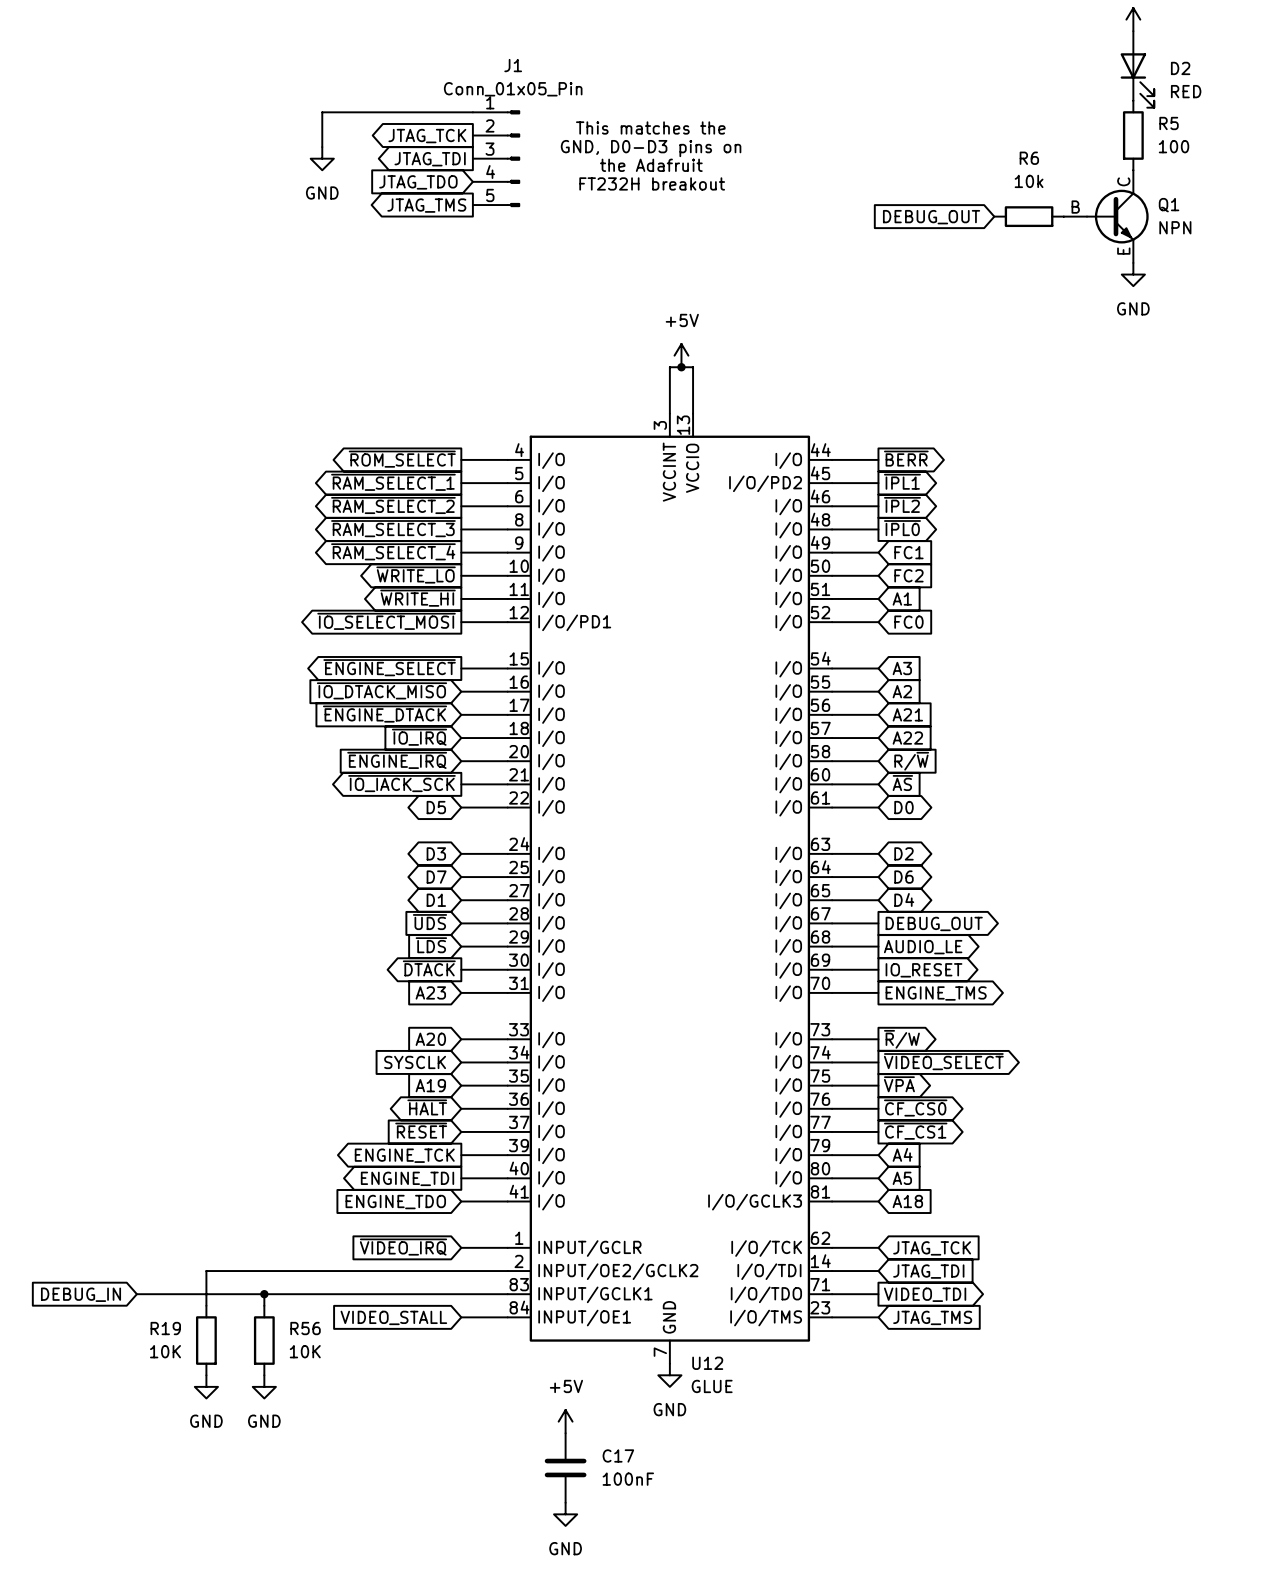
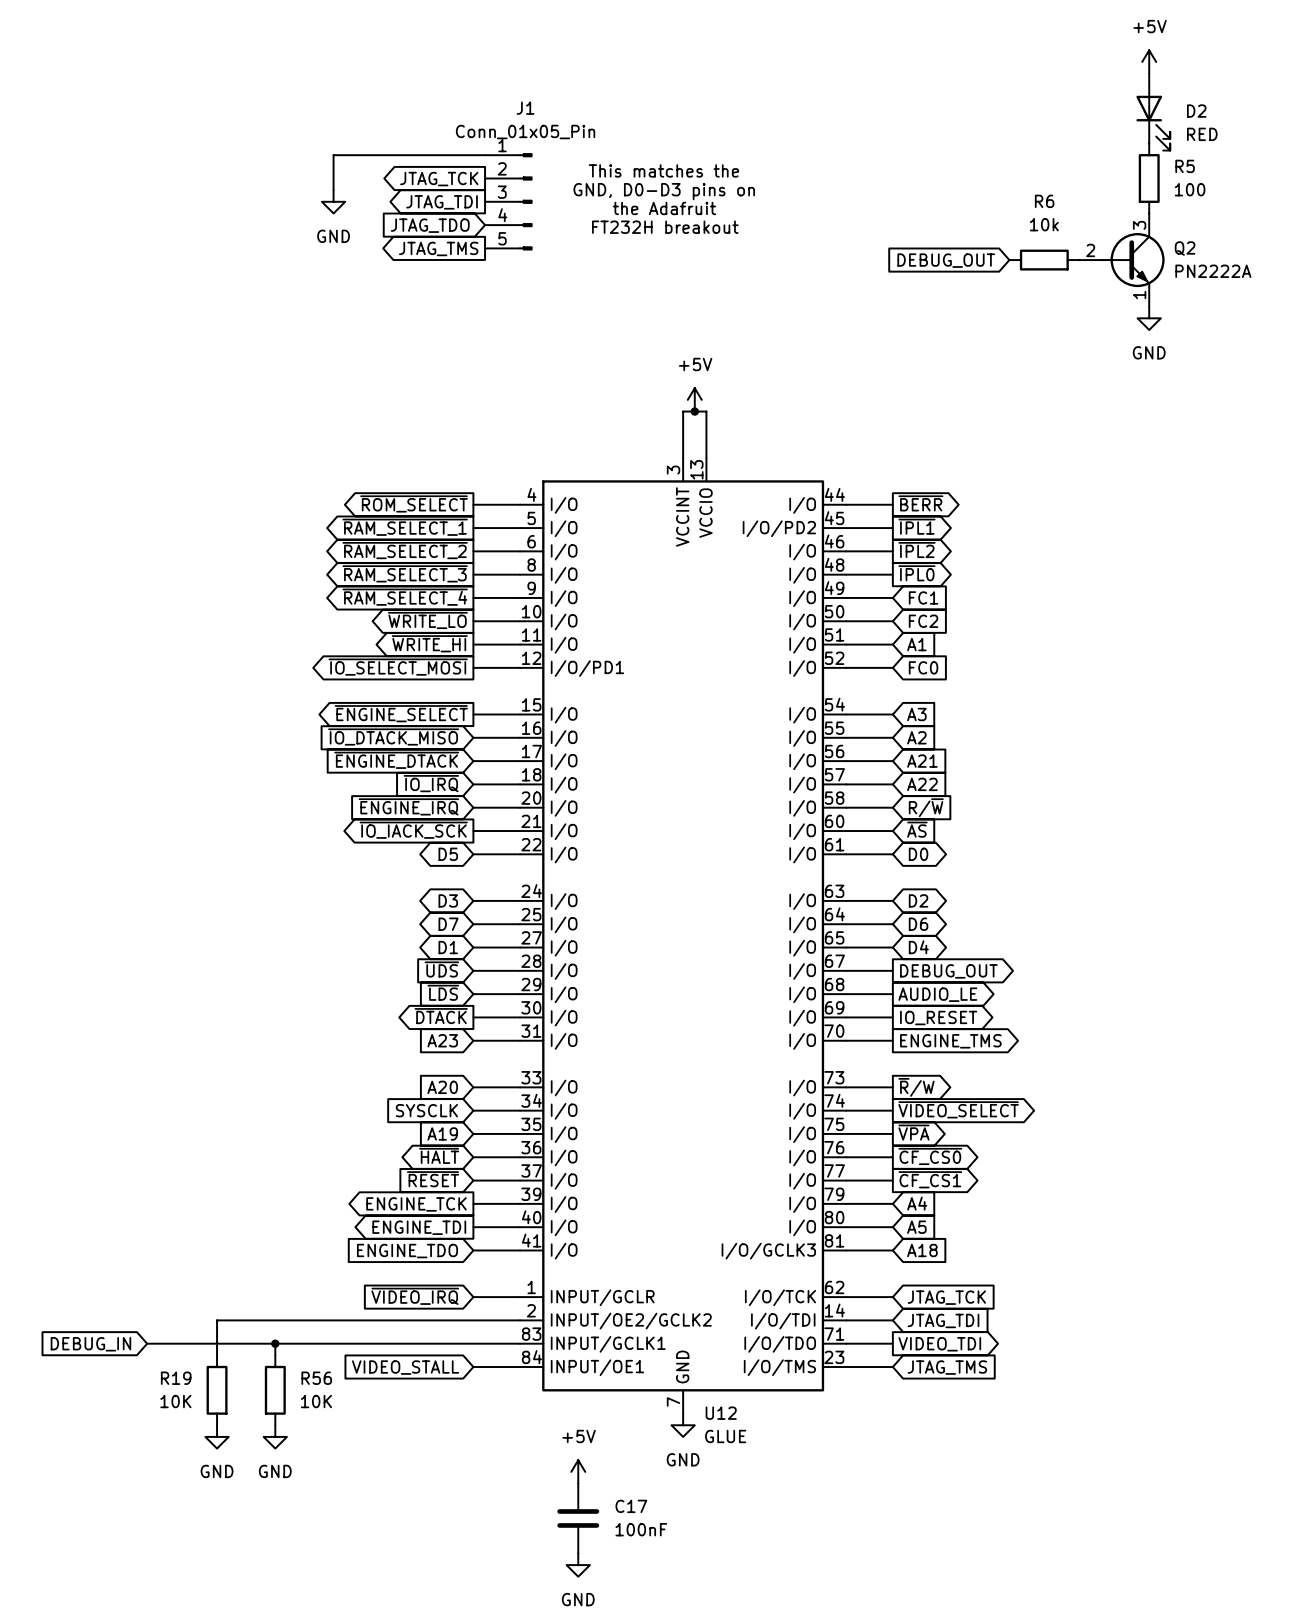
Q1: NPN (1106, 216) -> none
Q2: none -> PN2222A (1121, 260)

